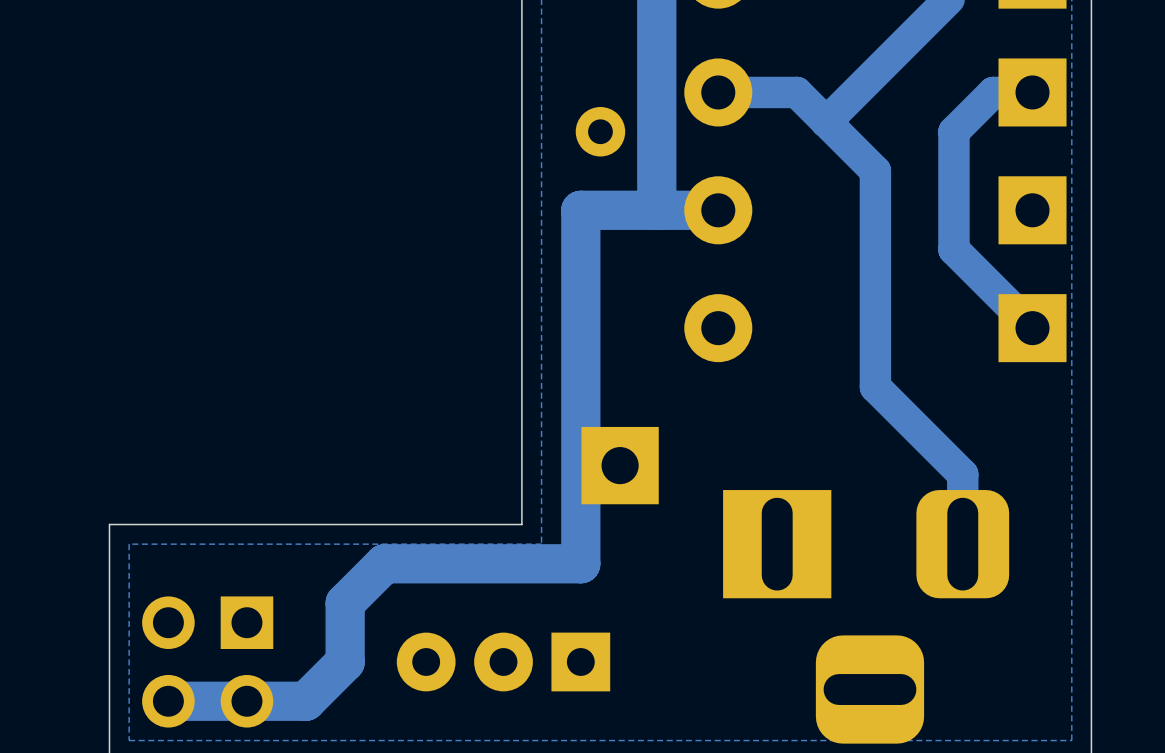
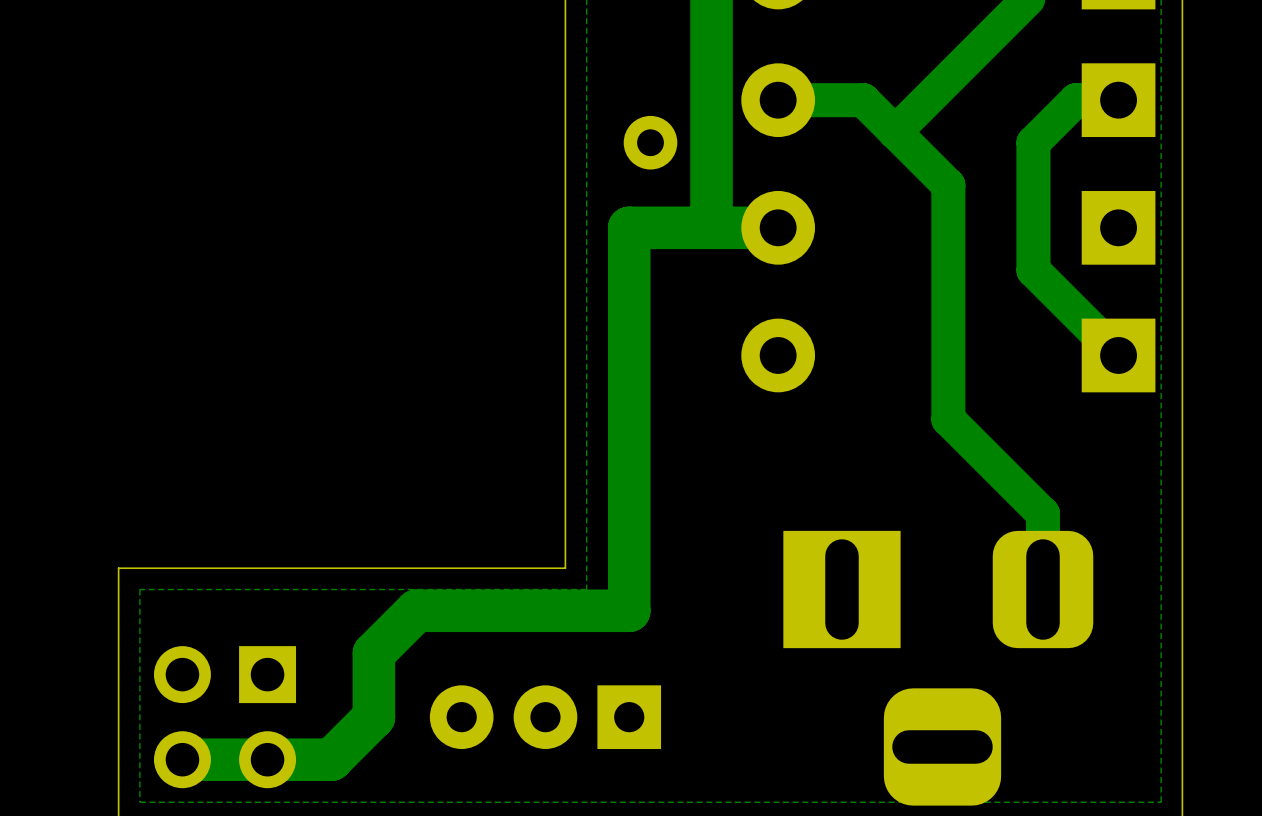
part: (620, 465) -> none

